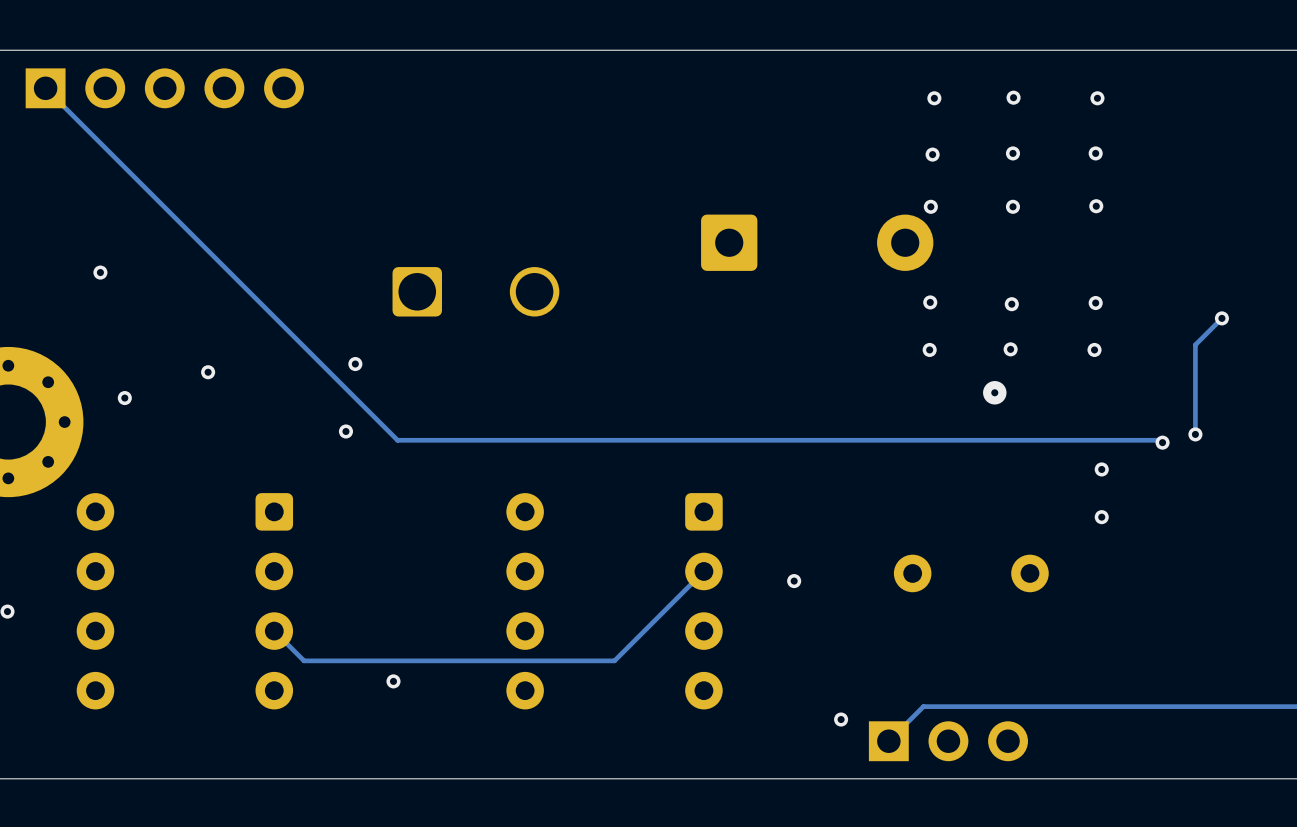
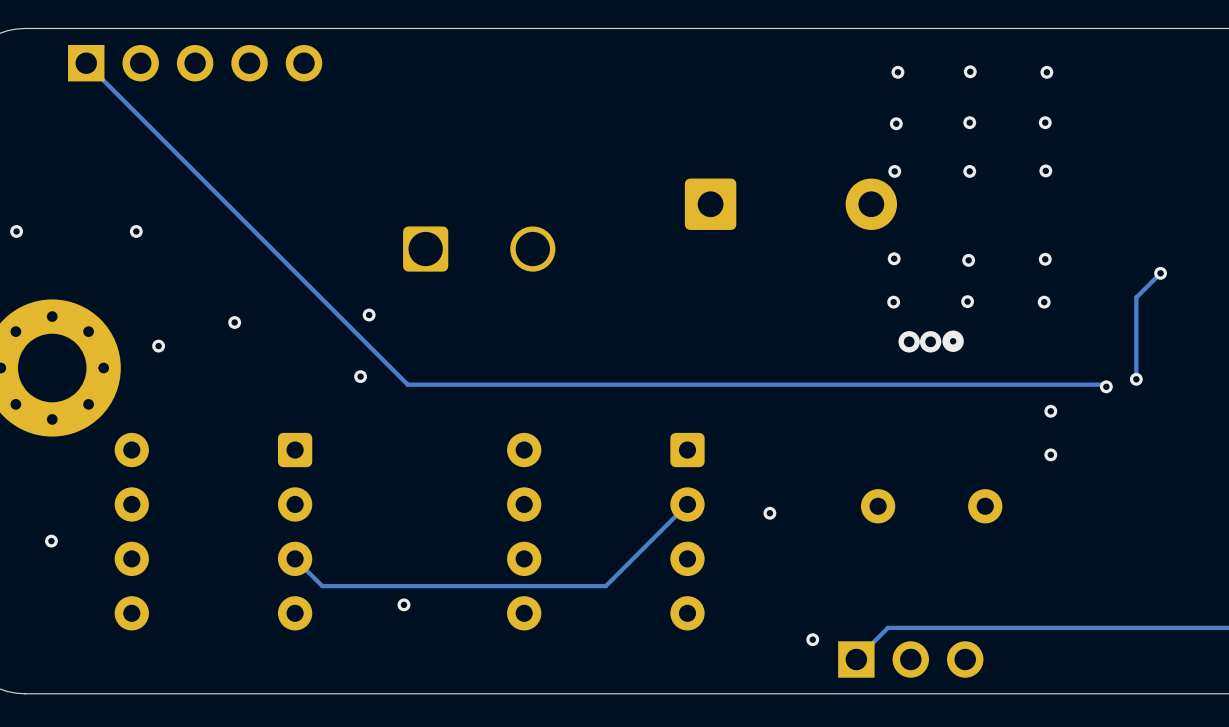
via: none -> (909, 341)
via: none -> (930, 341)

